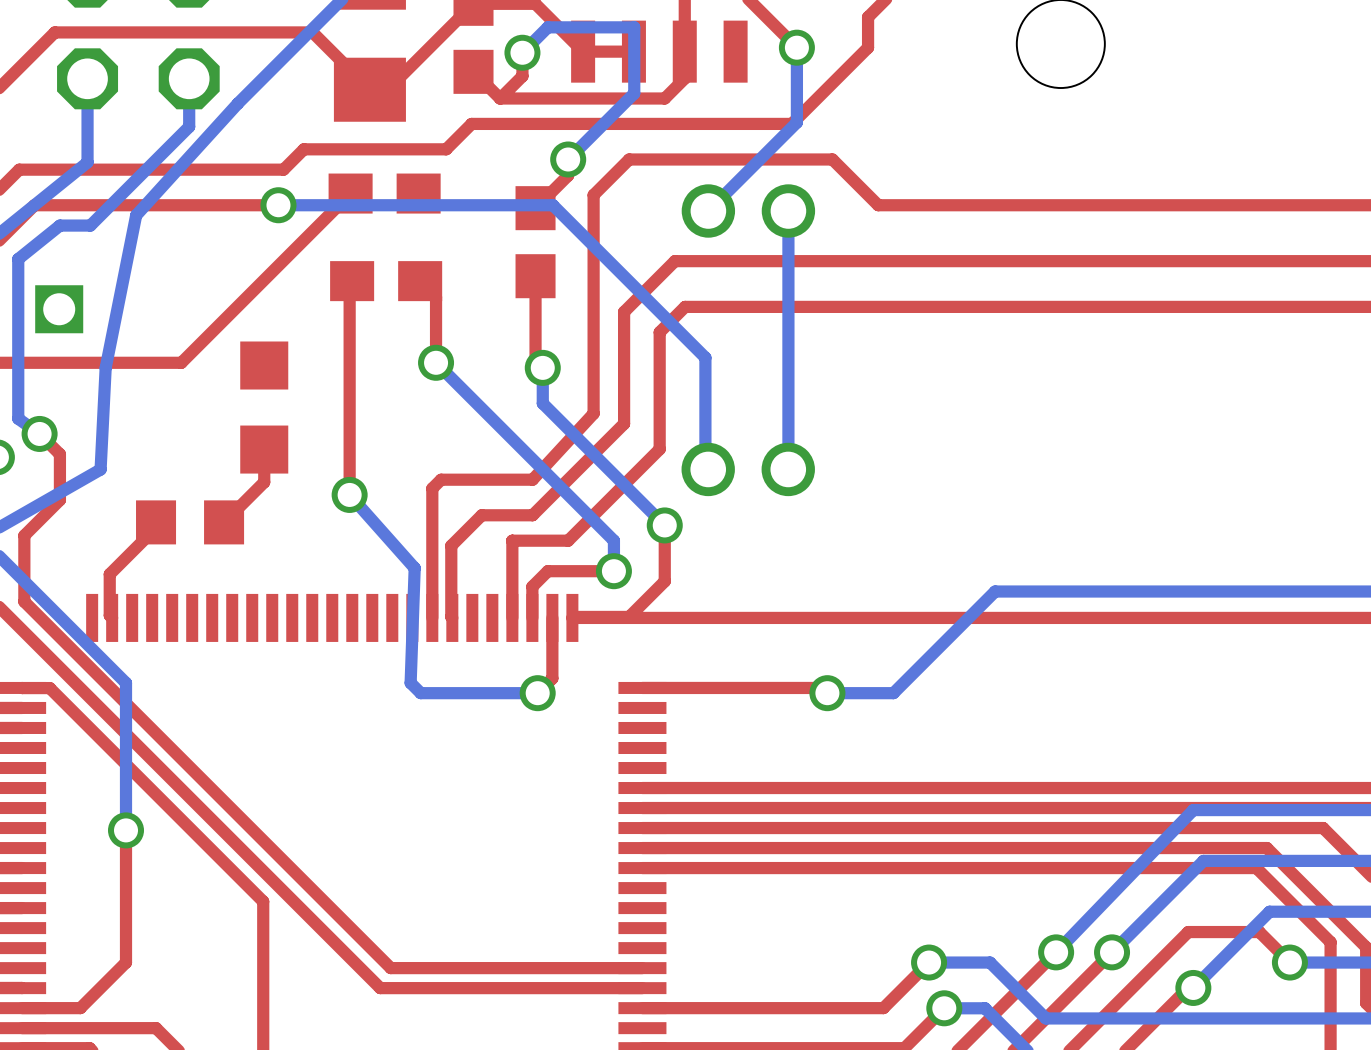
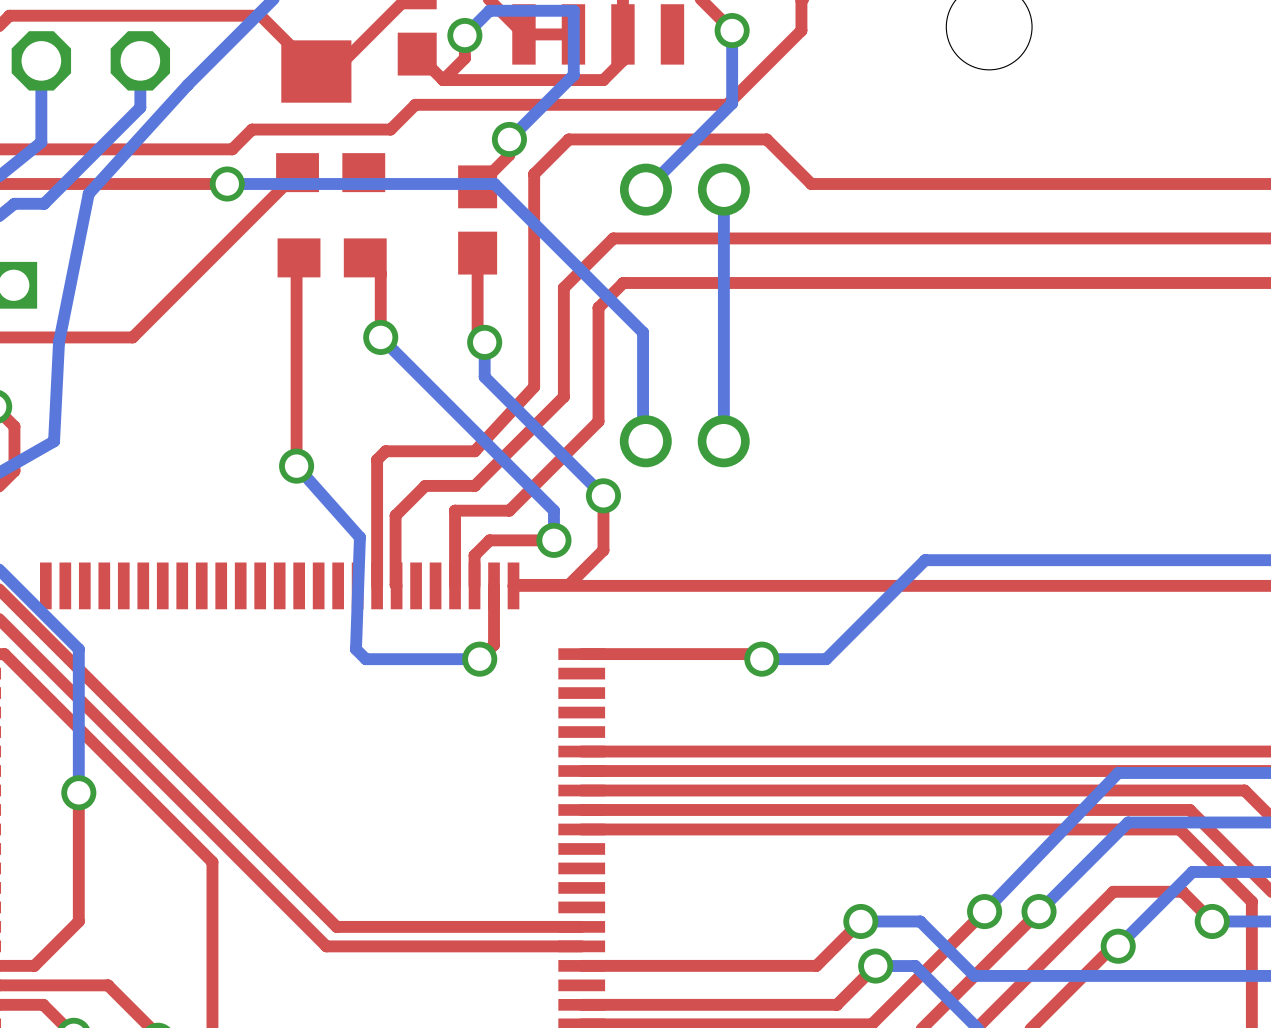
part: (264, 407) -> none
top track: (264, 449) (264, 482) (224, 522) -> none
top track: (156, 522) (156, 527) (109, 574) (109, 615) (112, 617) -> none
part: (190, 522) -> none

